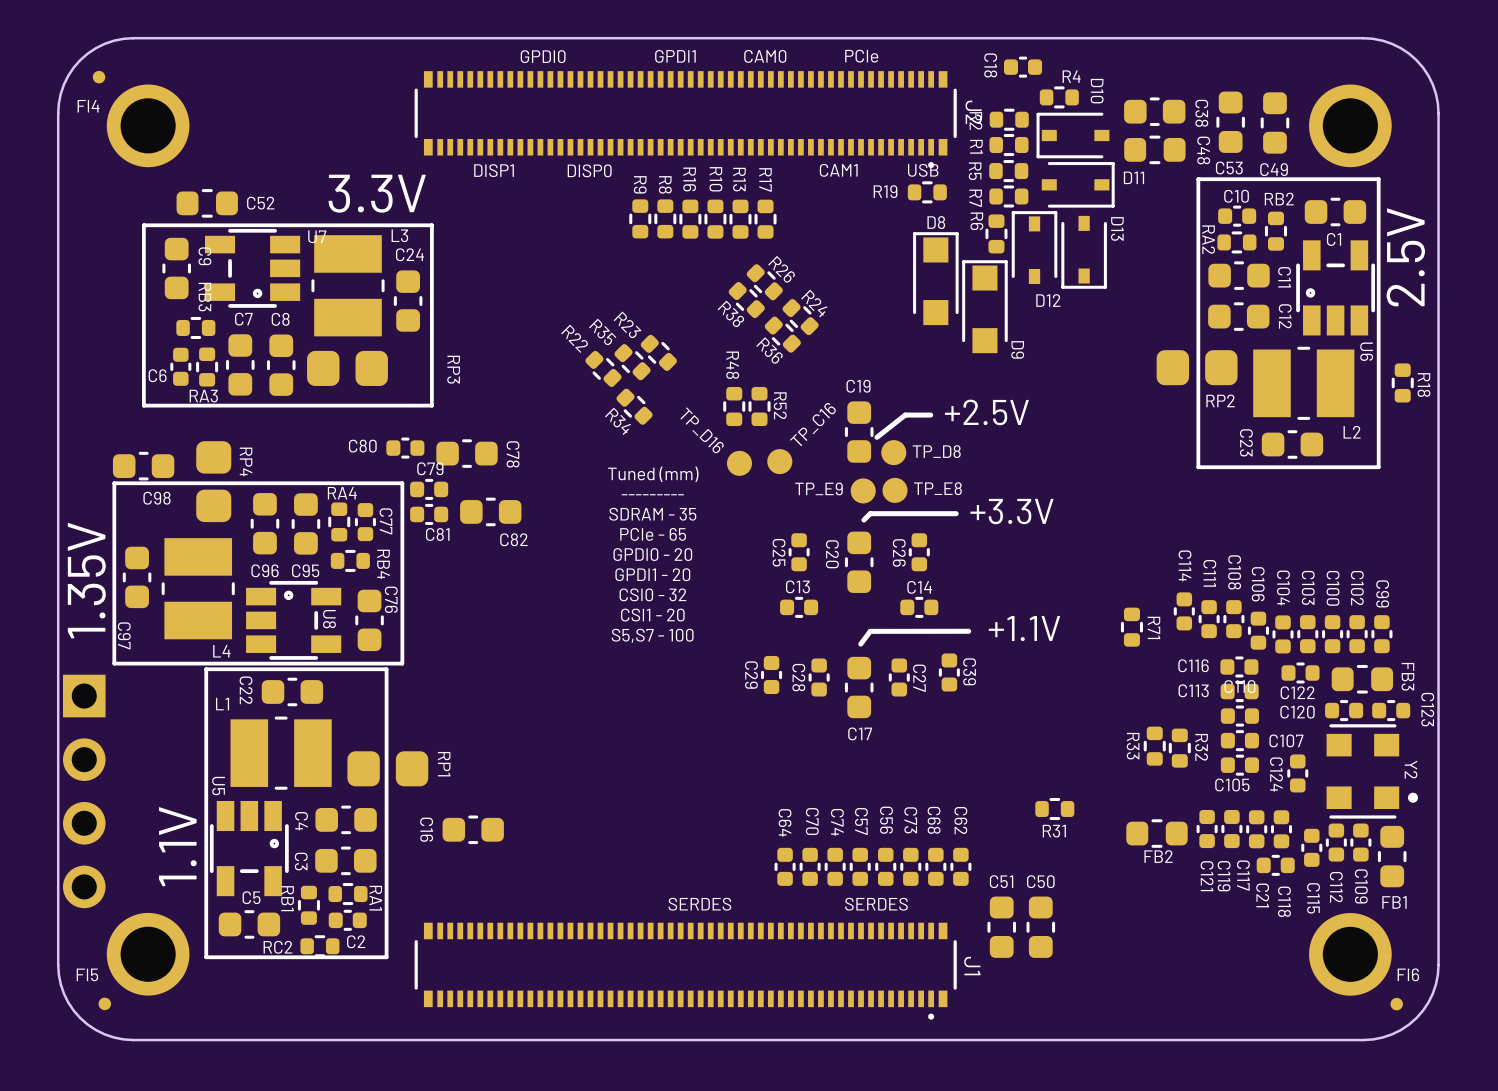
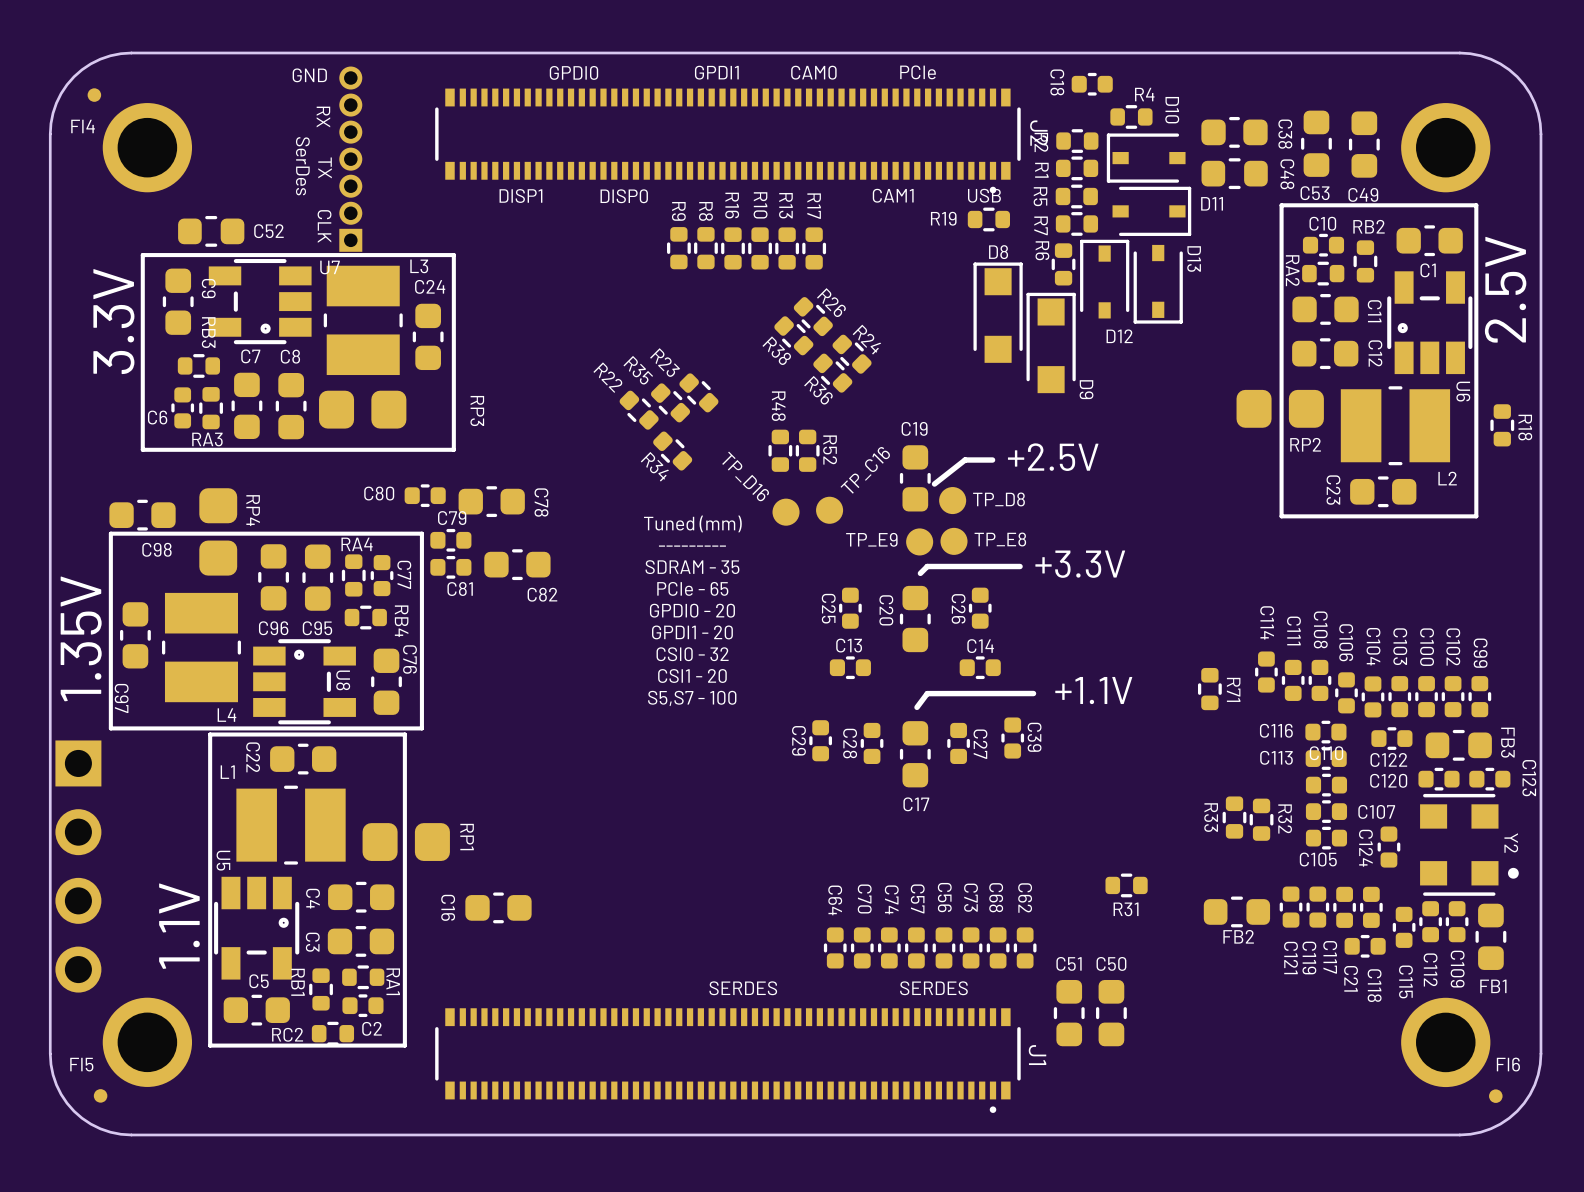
text: none -> GND (309, 75)
text: none -> RX (323, 116)
SerDes: none -> (350, 159)
text: none -> TX (325, 167)
text rotation: 0° (377, 193) -> 90° counterclockwise (113, 321)
text position: 3.3V (377, 193) -> 3.3V (113, 321)
text: none -> CLK (324, 226)

